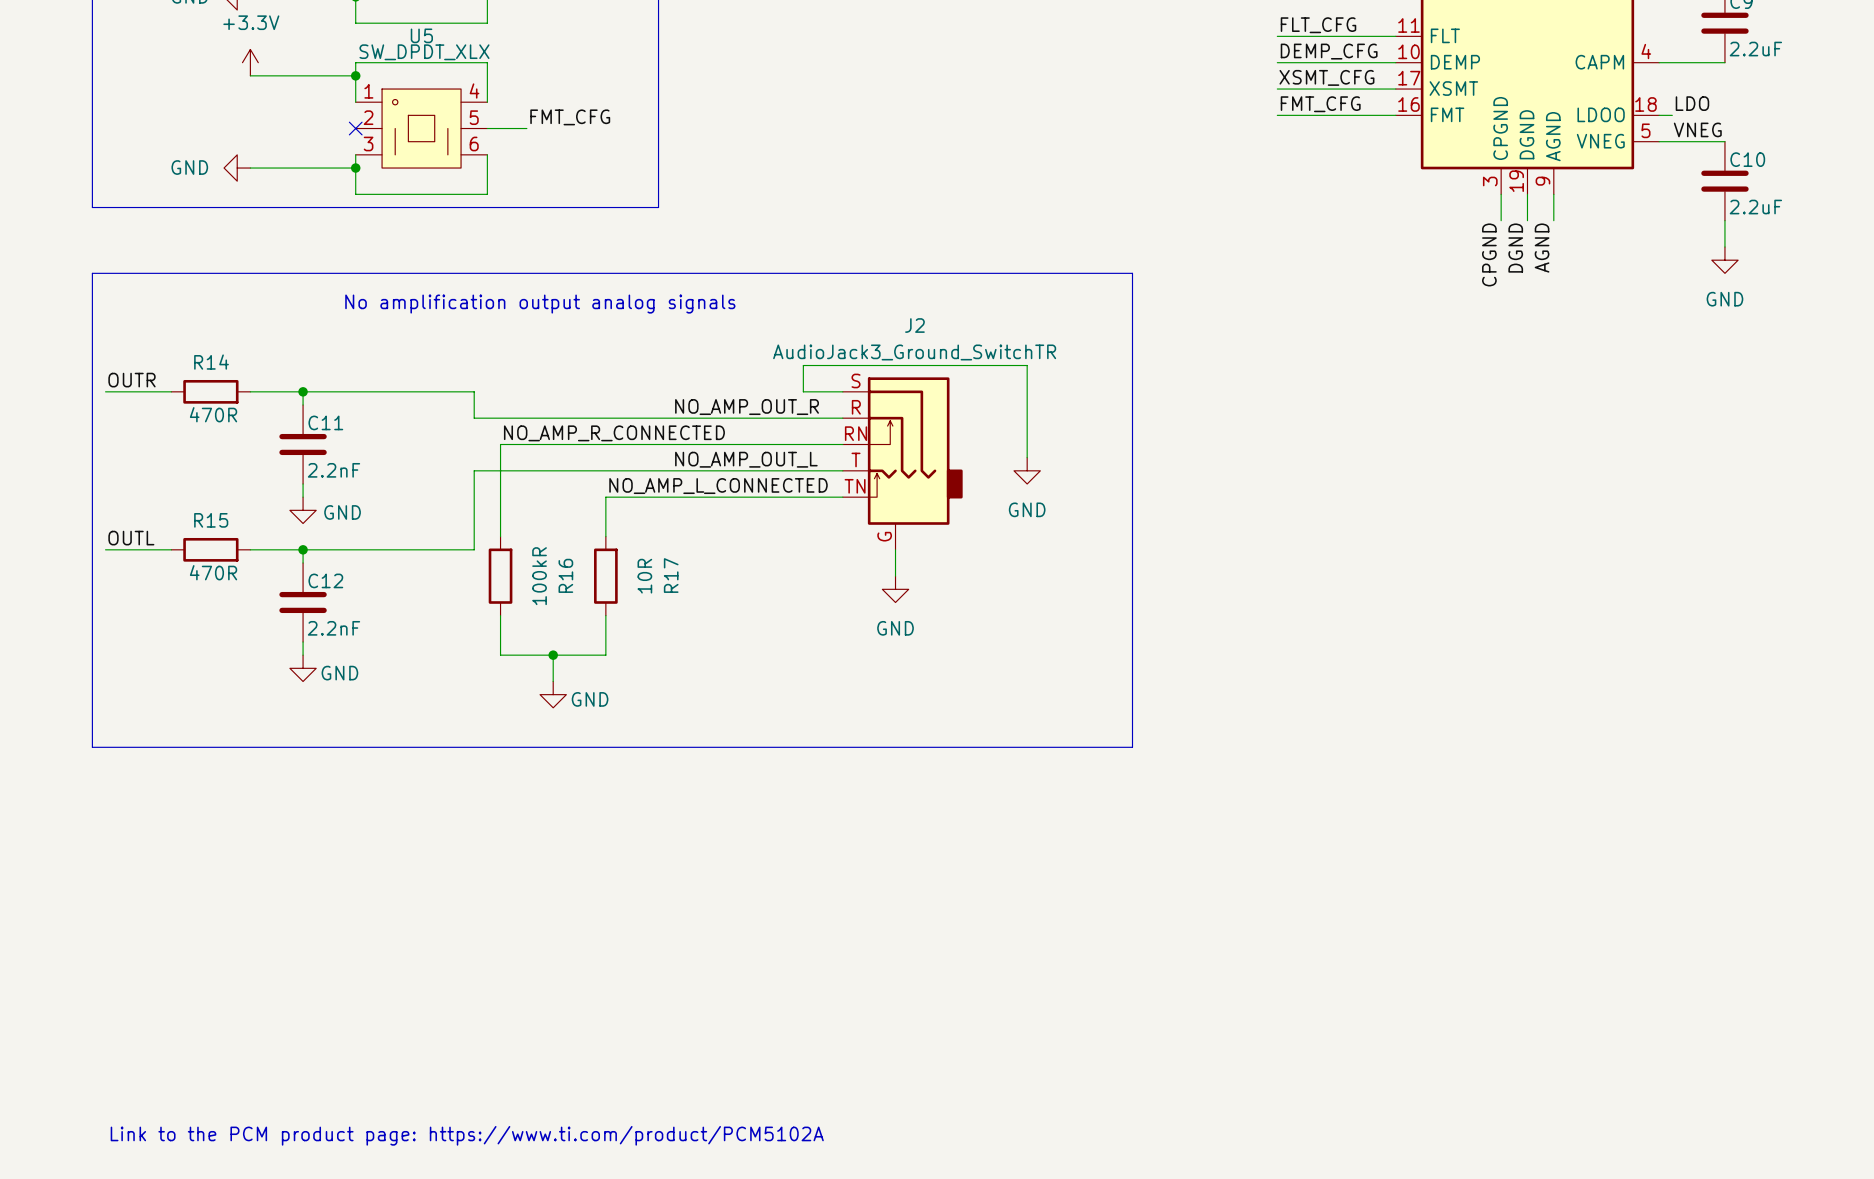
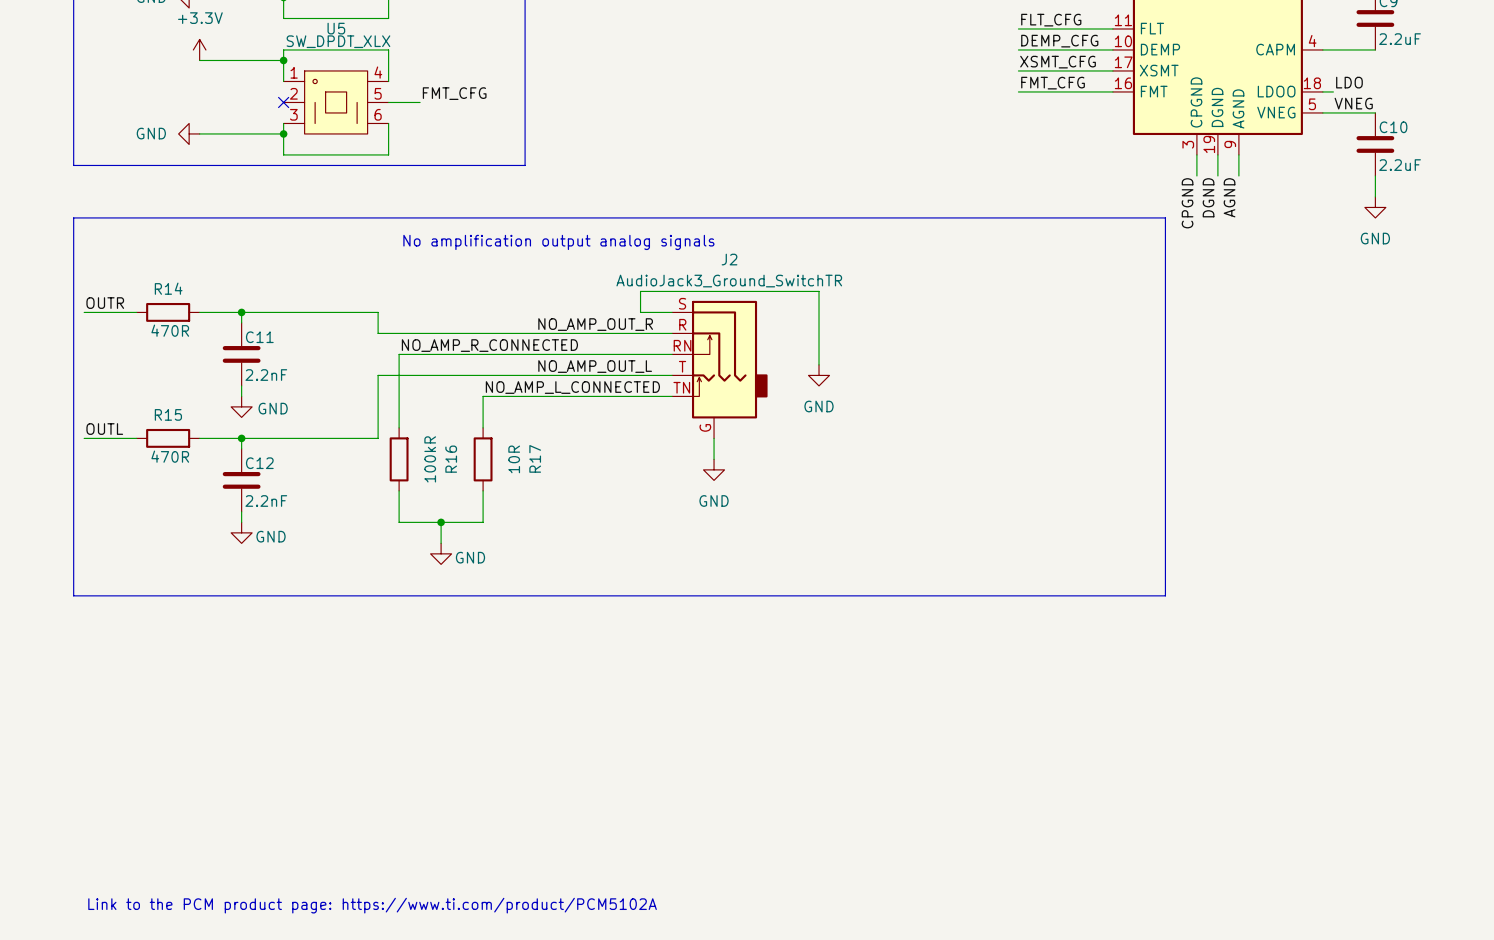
line: (1132, 273) (1132, 747) -> (902, 217) (1165, 217) (1165, 595) (902, 595)
text position: No amplification output analog signals (540, 304) -> No amplification output analog signals (558, 242)

